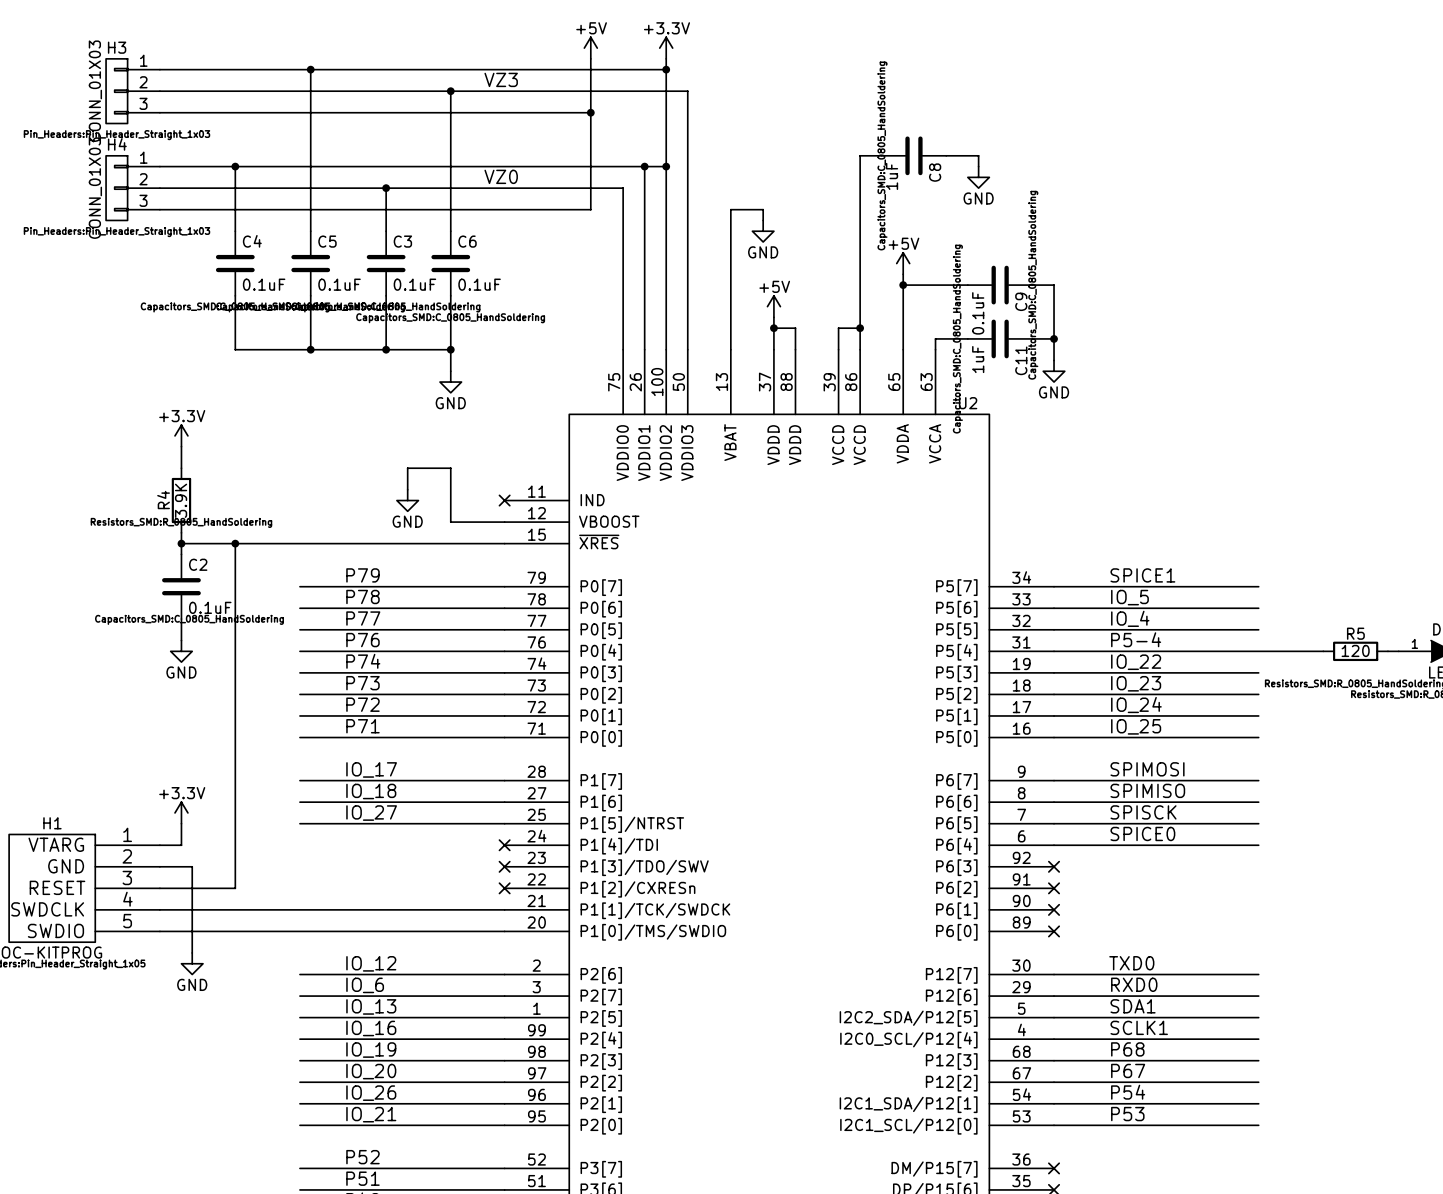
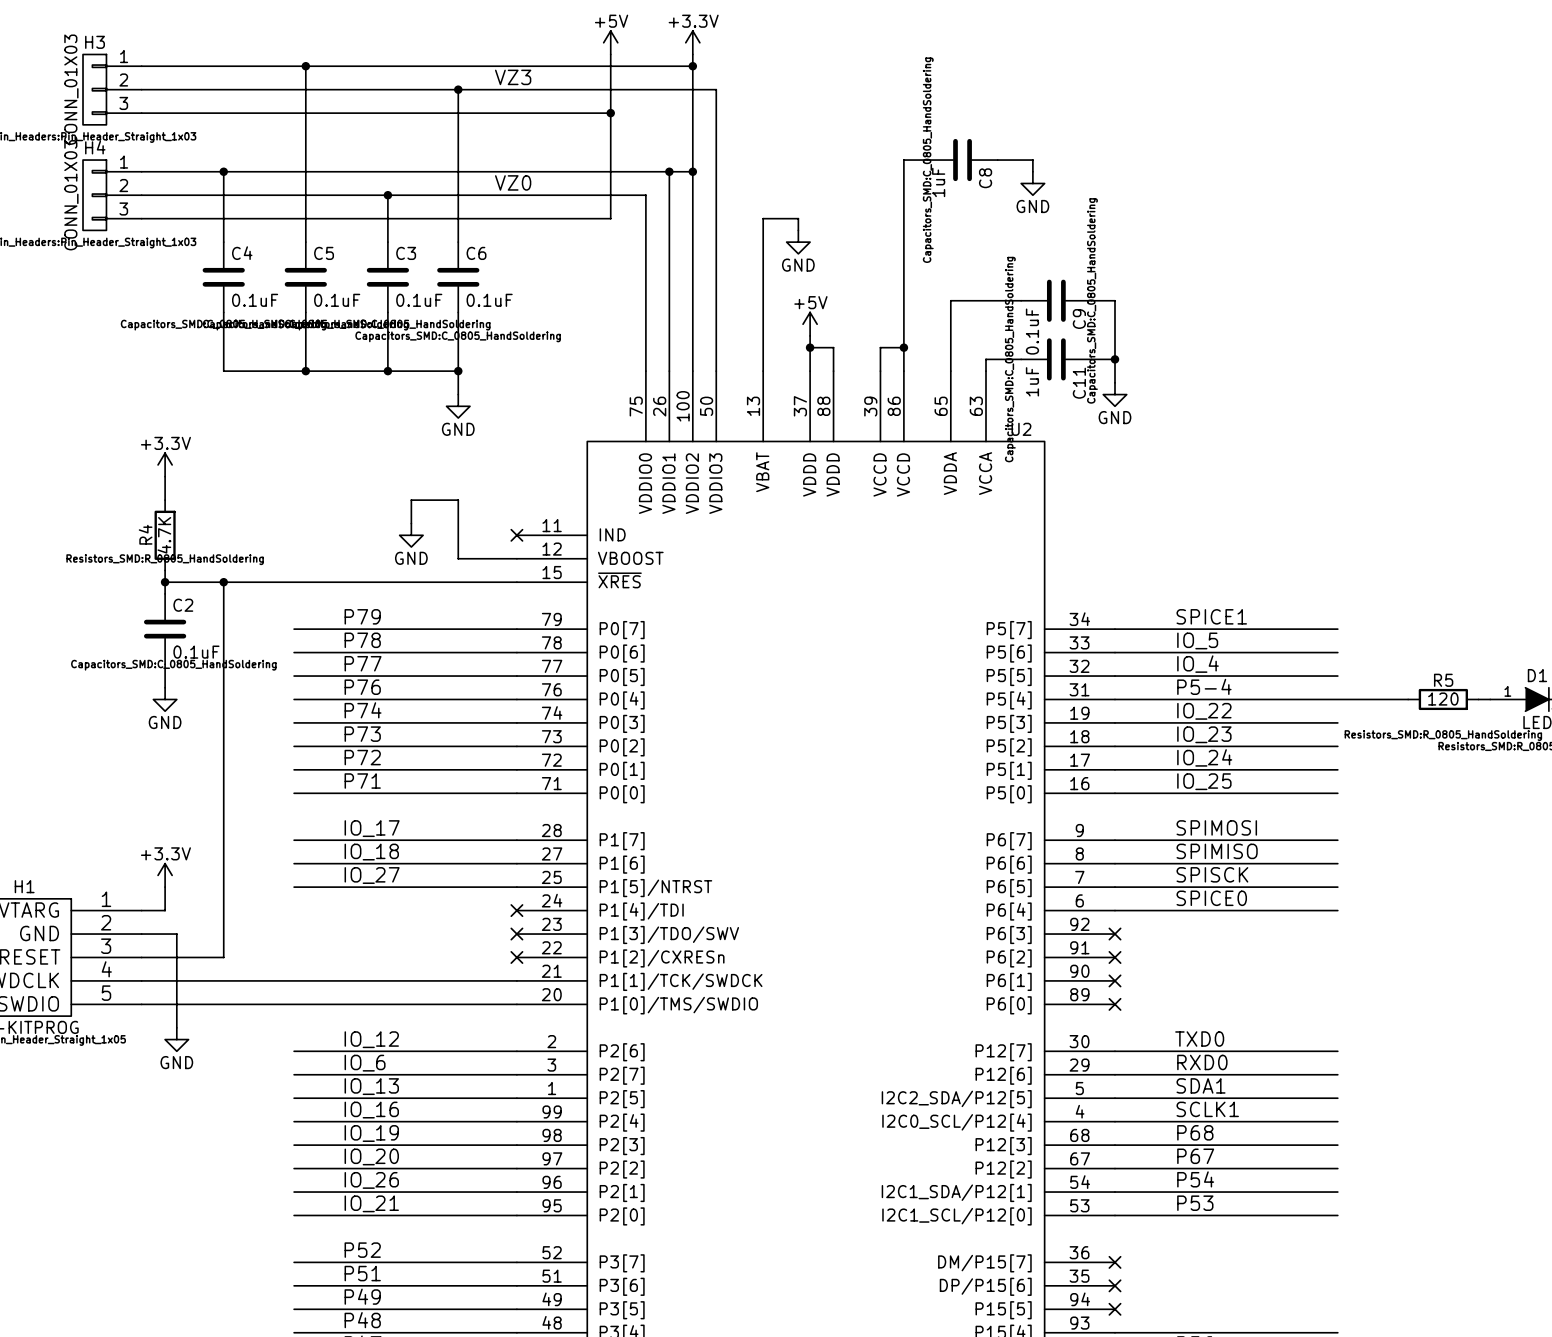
power symbol: +5V (903, 263) -> none
wire: (903, 274) (903, 285) -> none
junction: (903, 285) -> none
R4 value: 3.9K (181, 500) -> 4.7K (164, 535)

